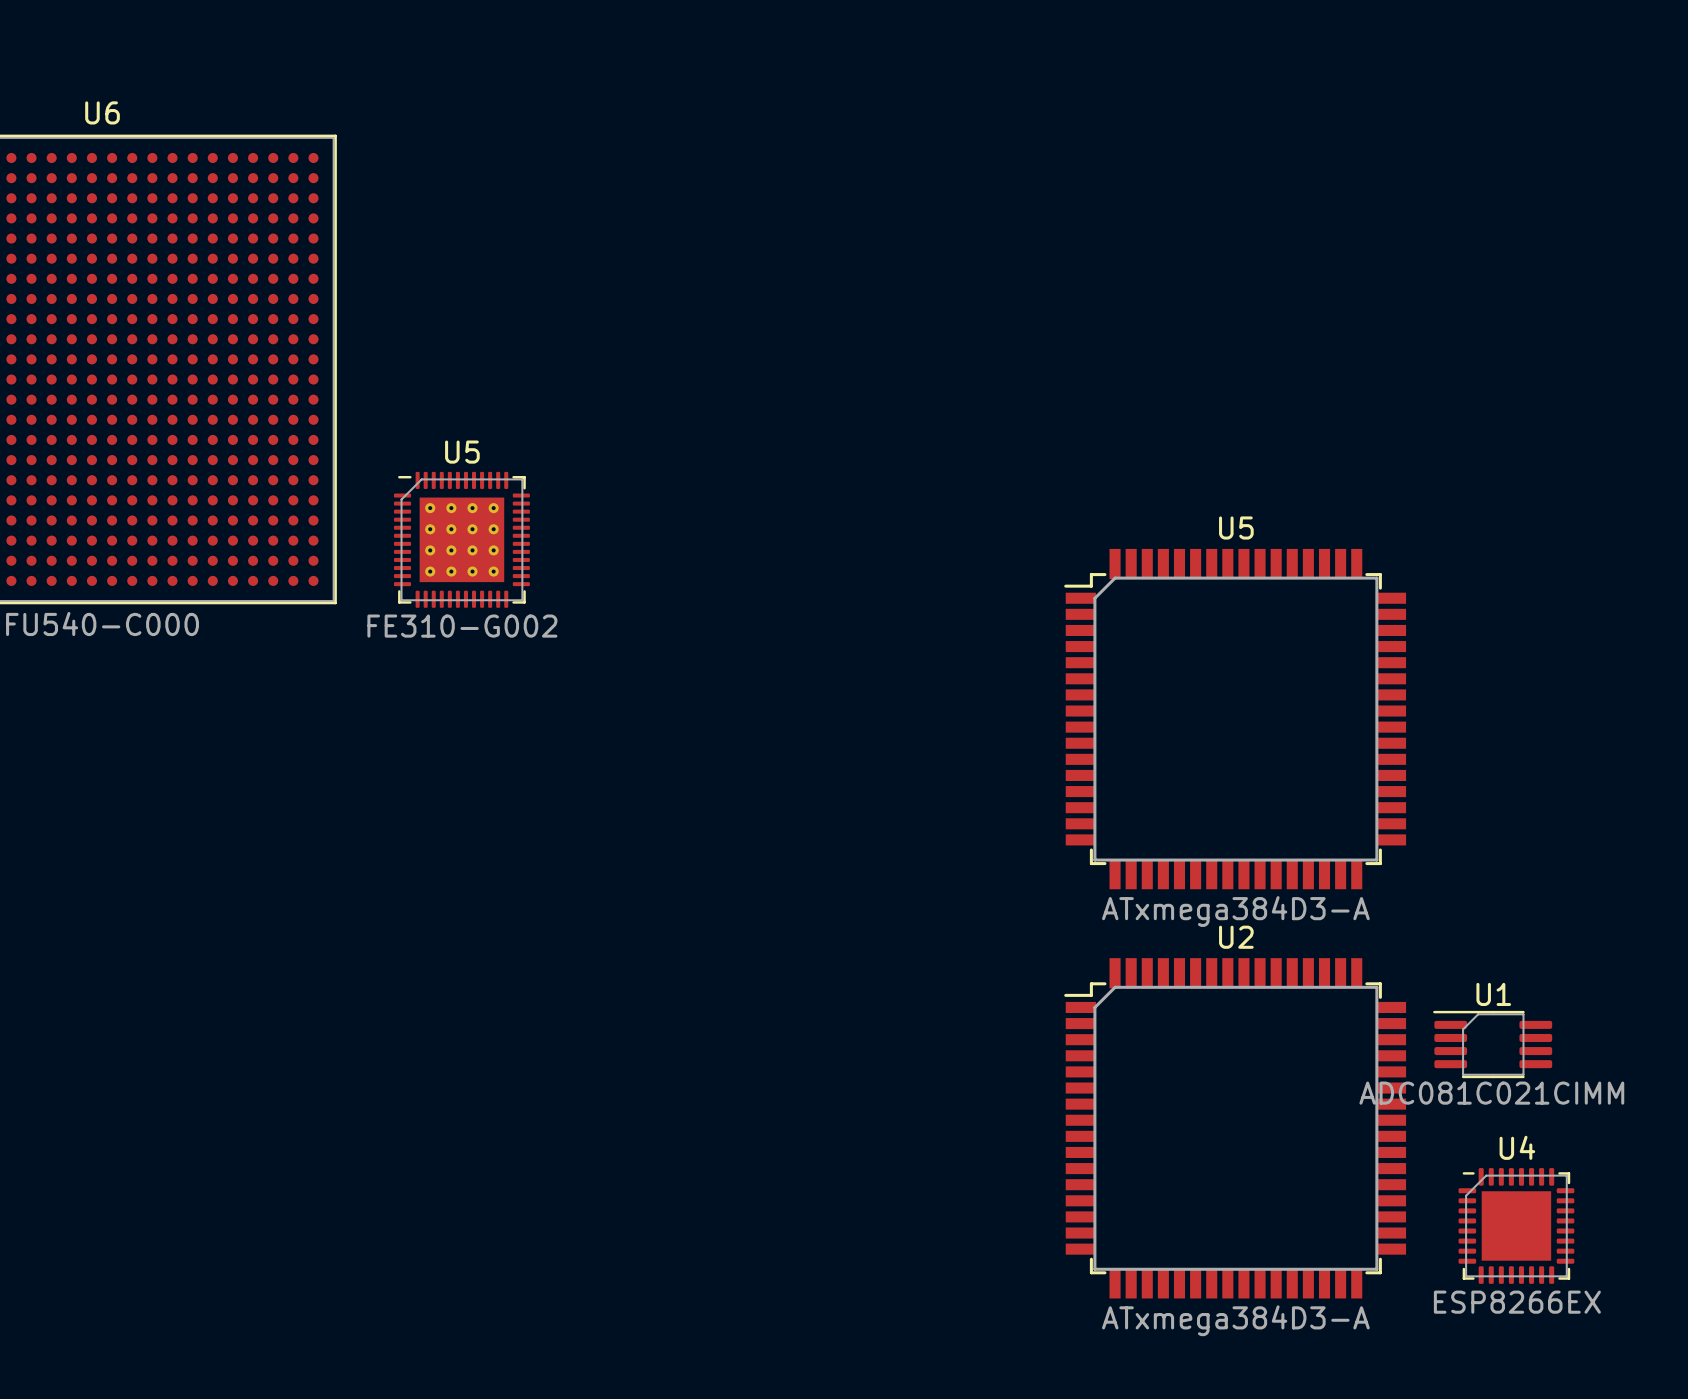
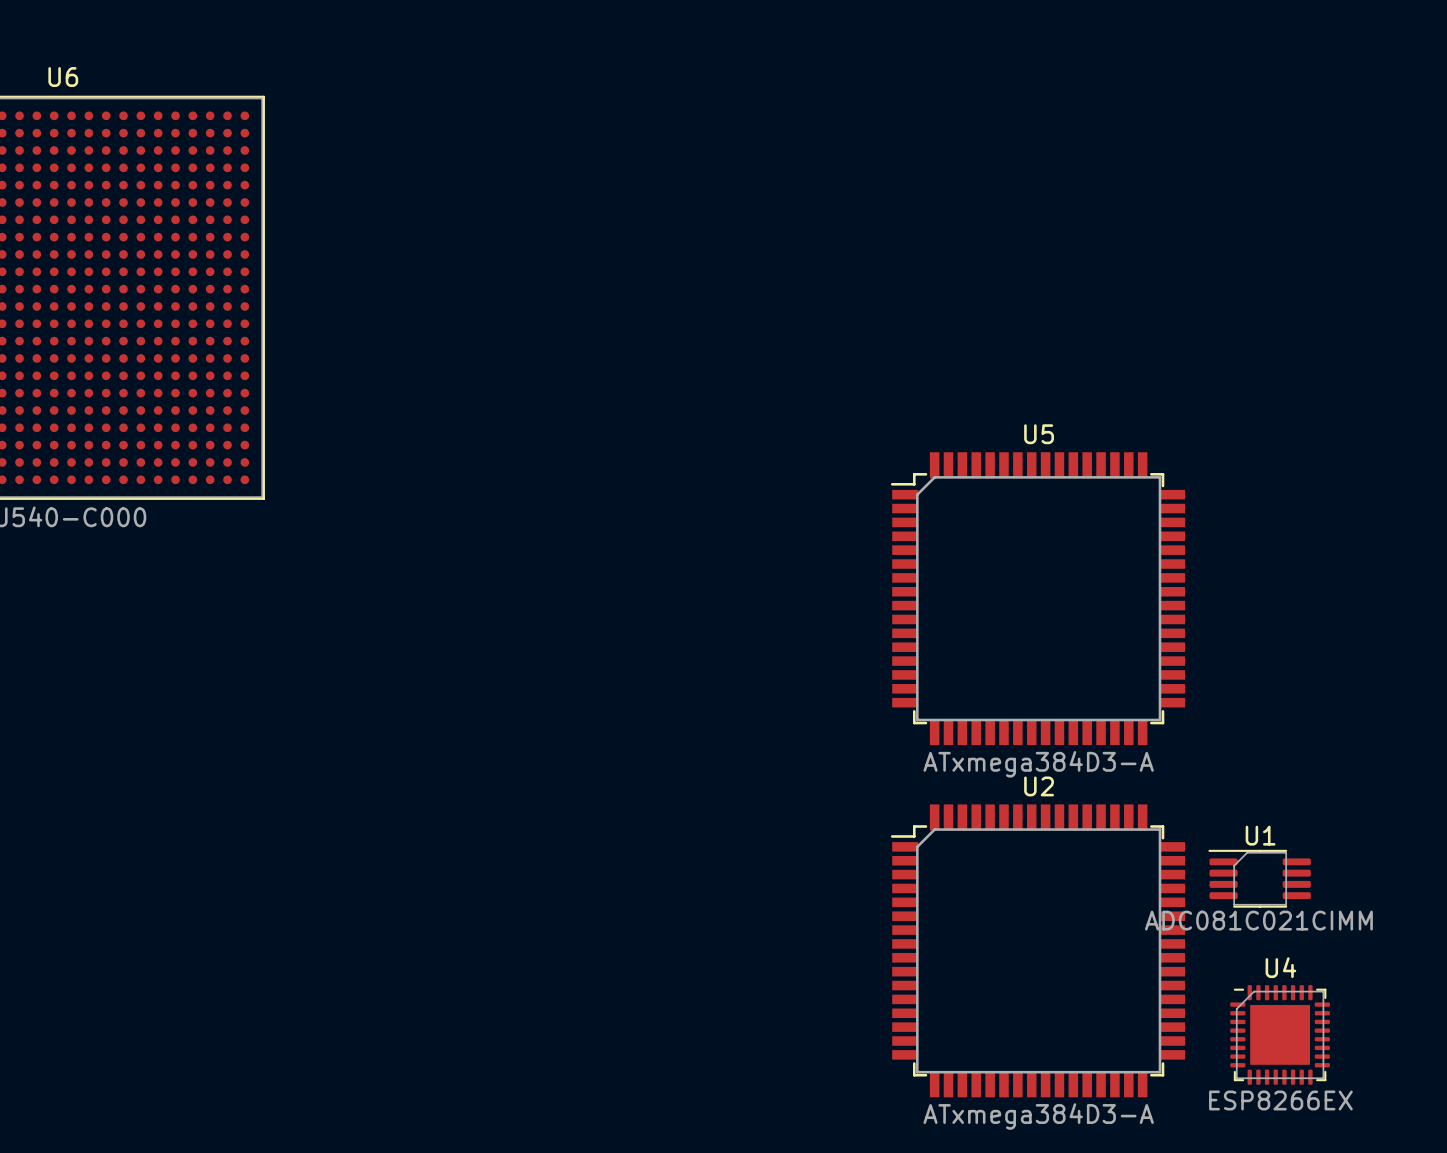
U5: FE310-G002 (461, 539) -> none

